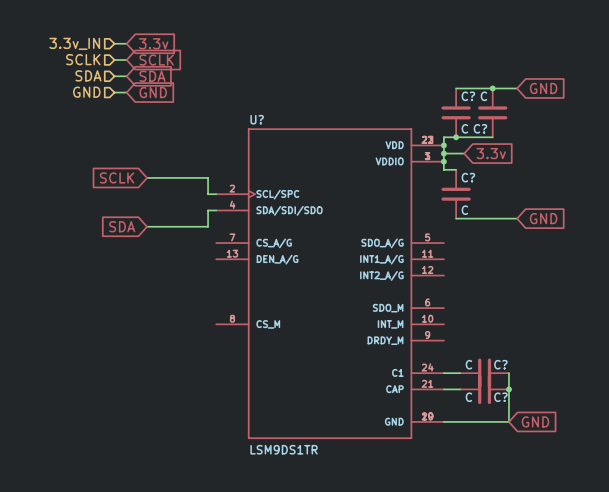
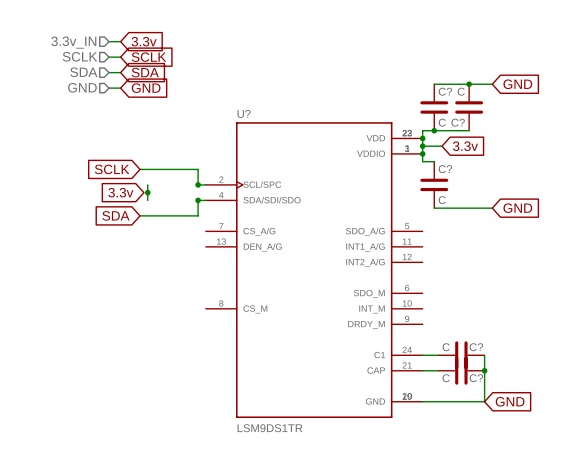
wire: none -> (147, 184) (147, 200)
junction: none -> (198, 184)
global label: none -> 3.3v (120, 192)
junction: none -> (147, 192)
junction: none -> (198, 200)

